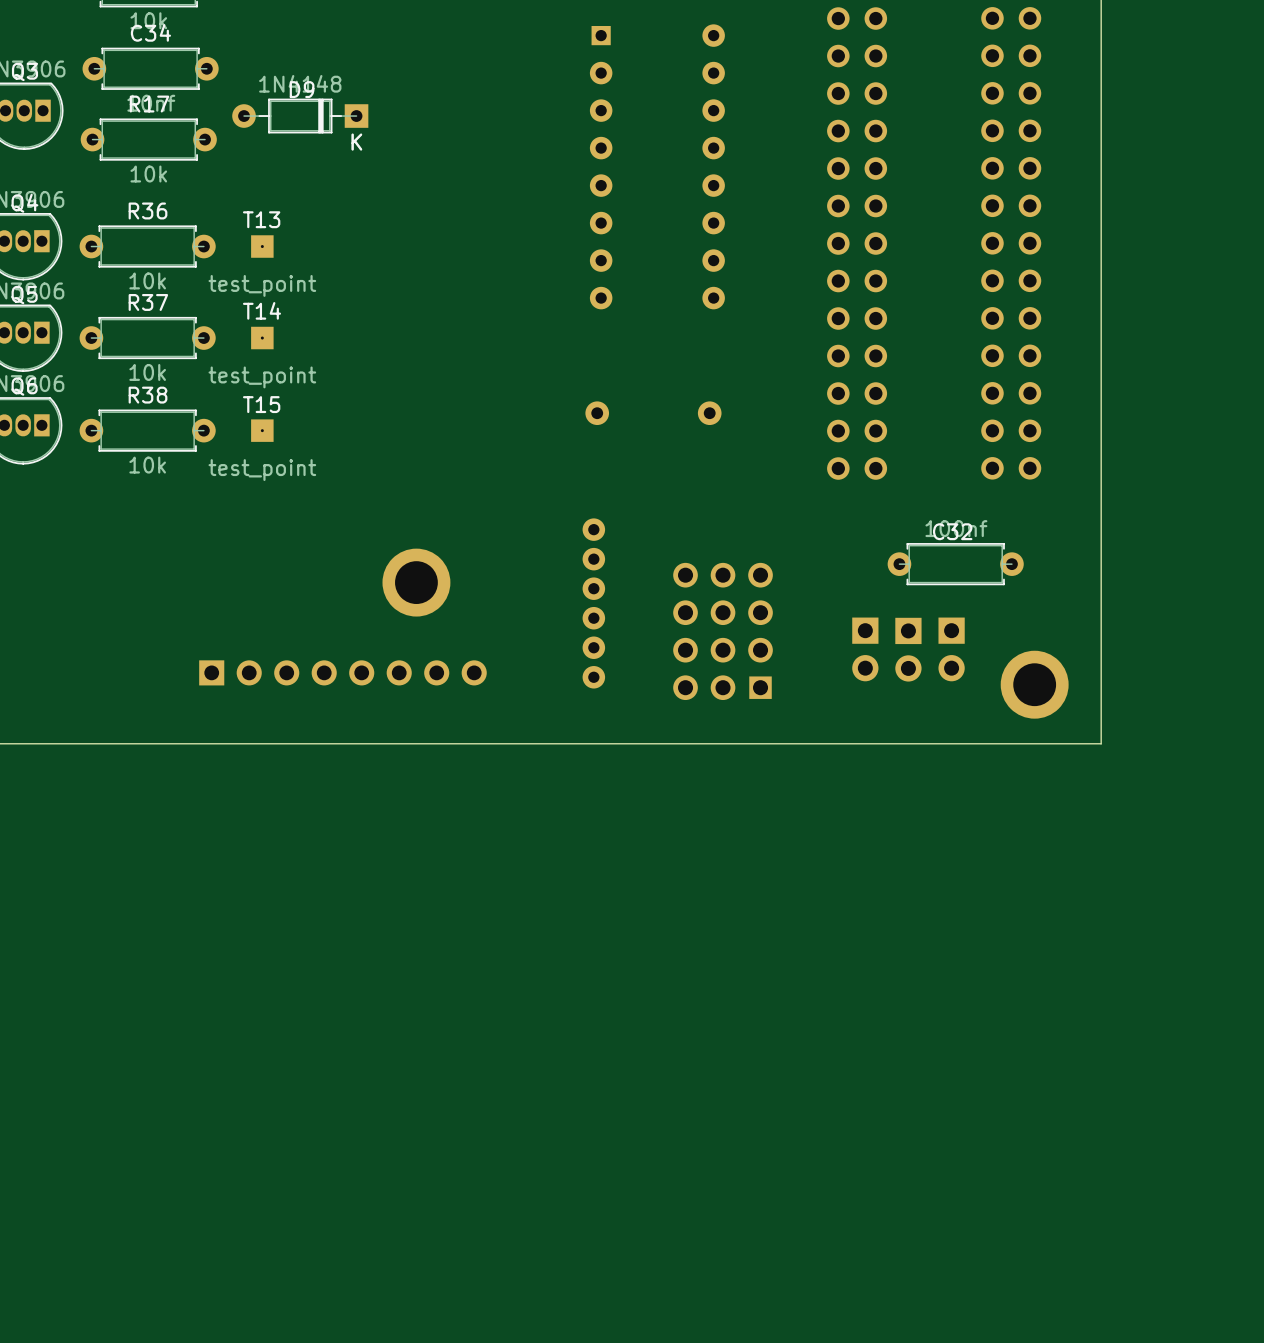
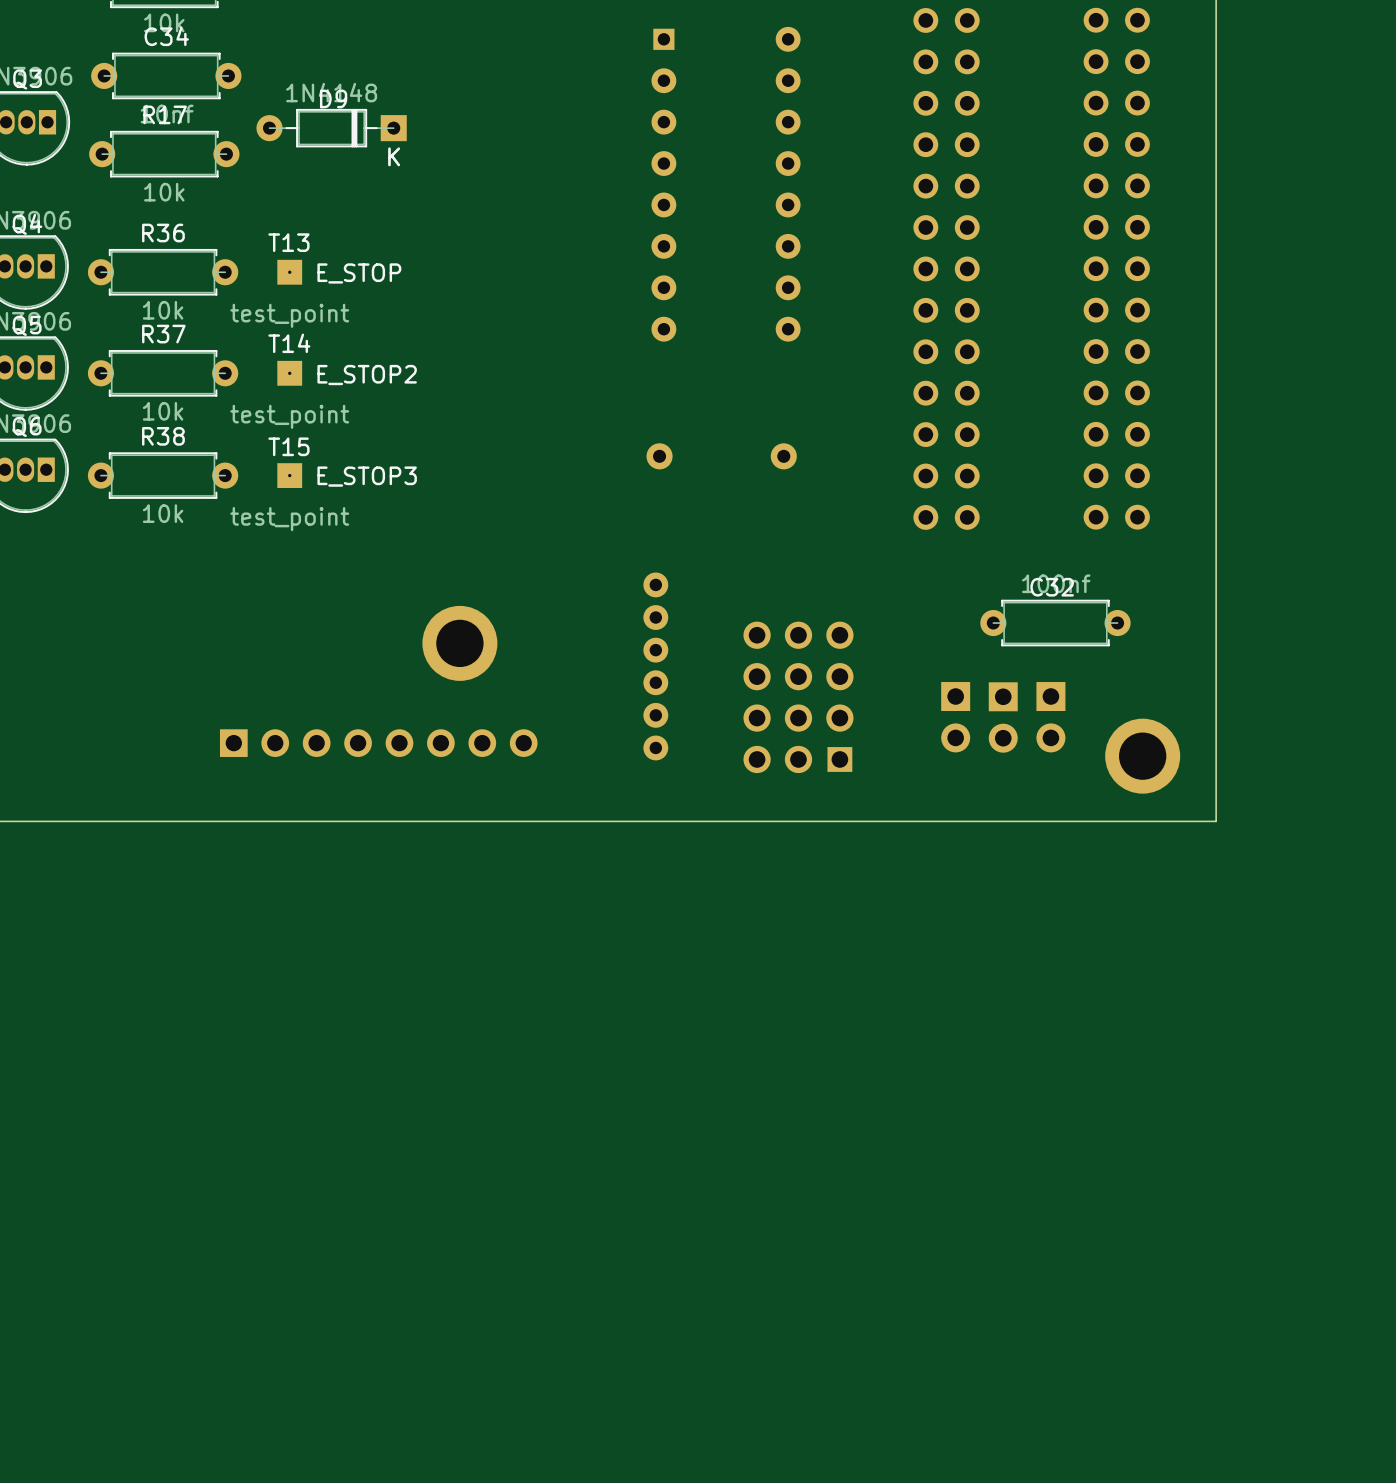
text: none -> E_STOP (359, 273)
text: none -> E_STOP2 (367, 375)
text: none -> E_STOP3 (367, 476)

